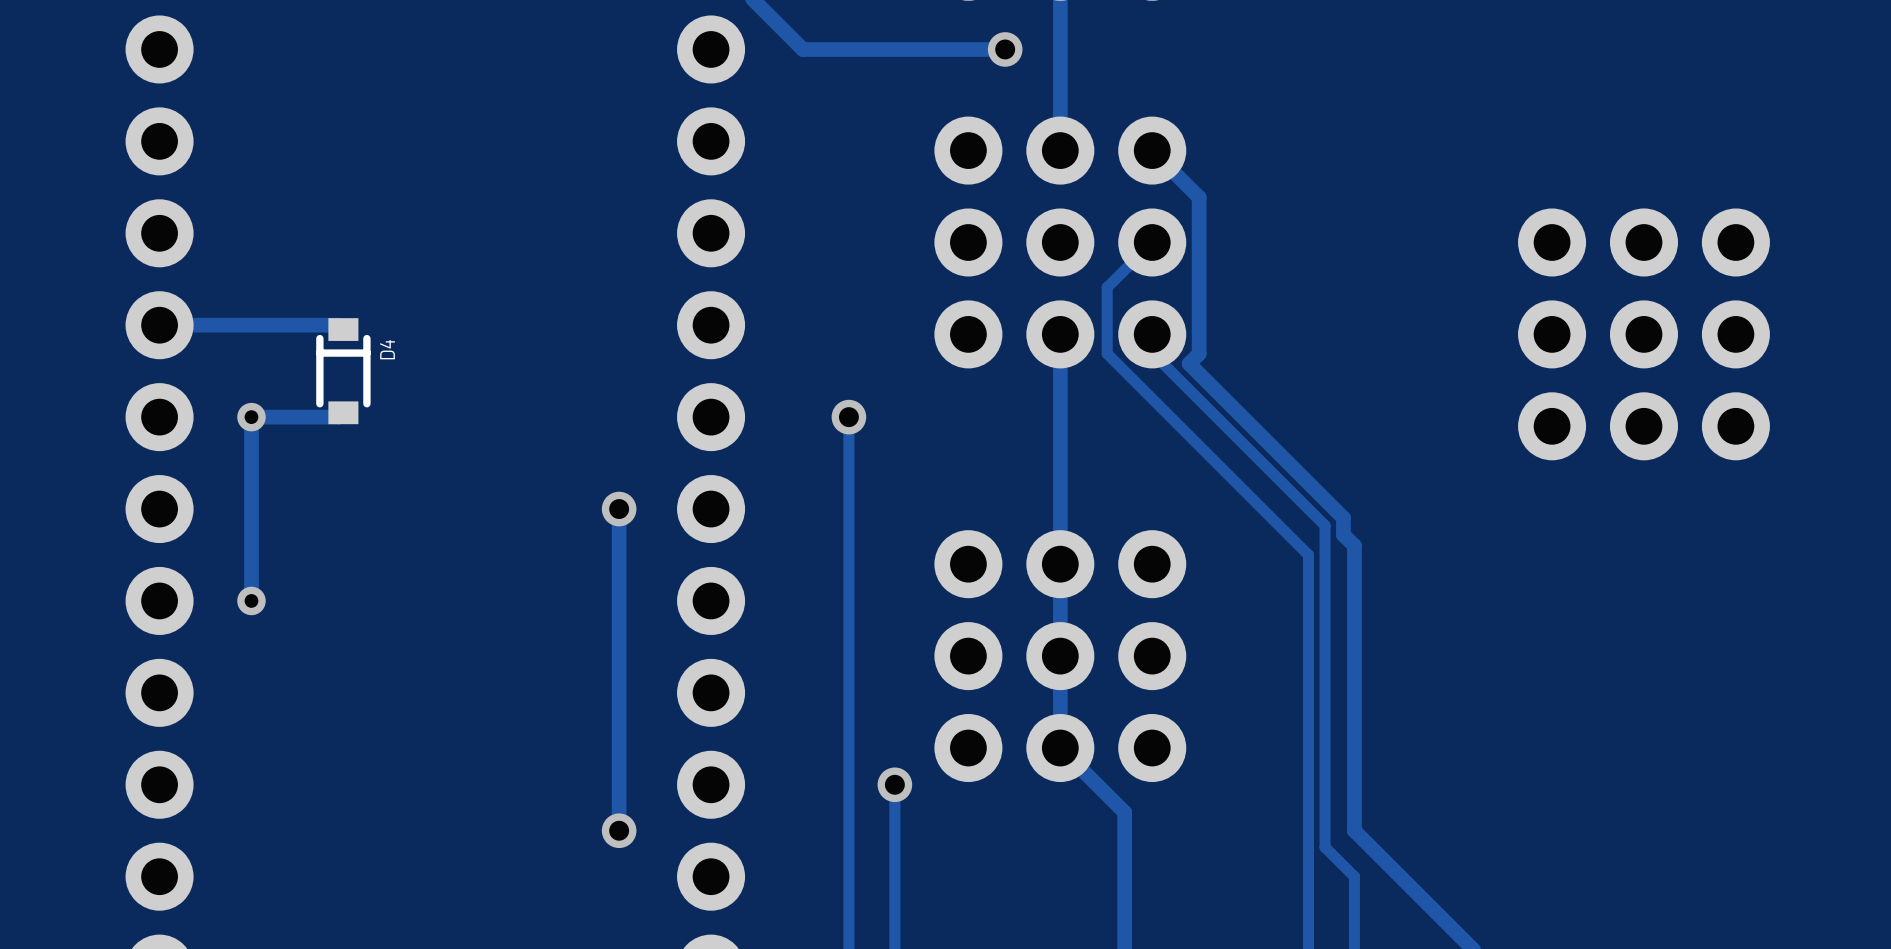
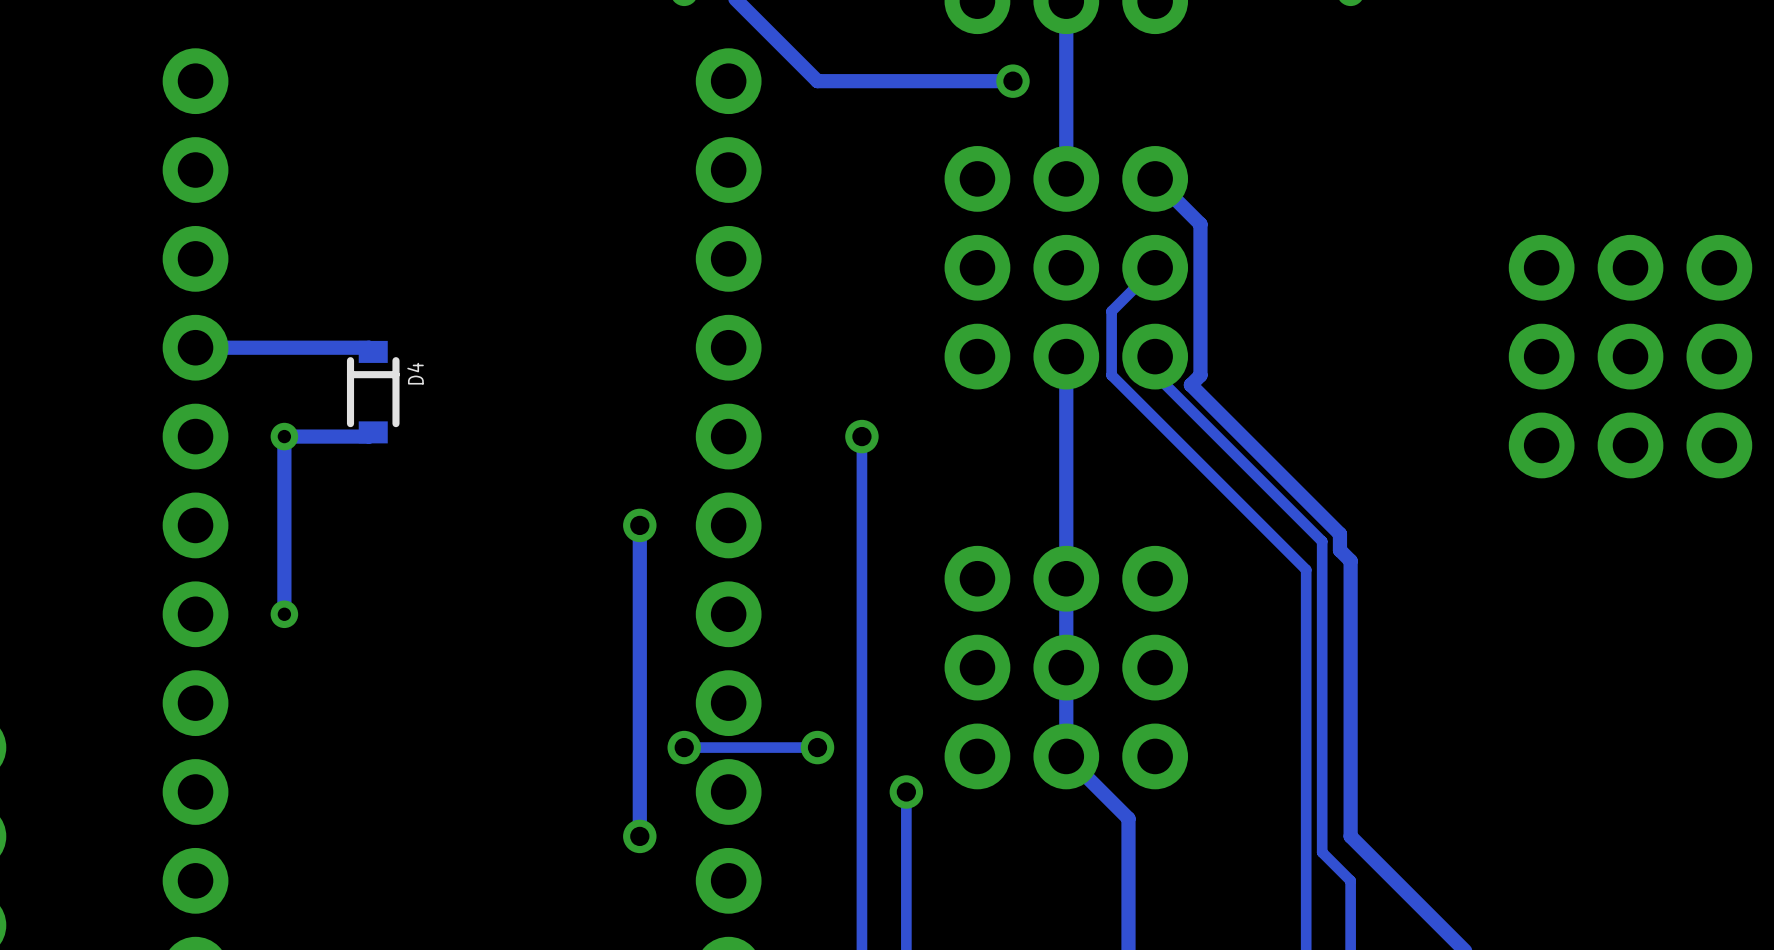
via: none -> (684, 747)
track: none -> (817, 747) (684, 747)
via: none -> (817, 747)

